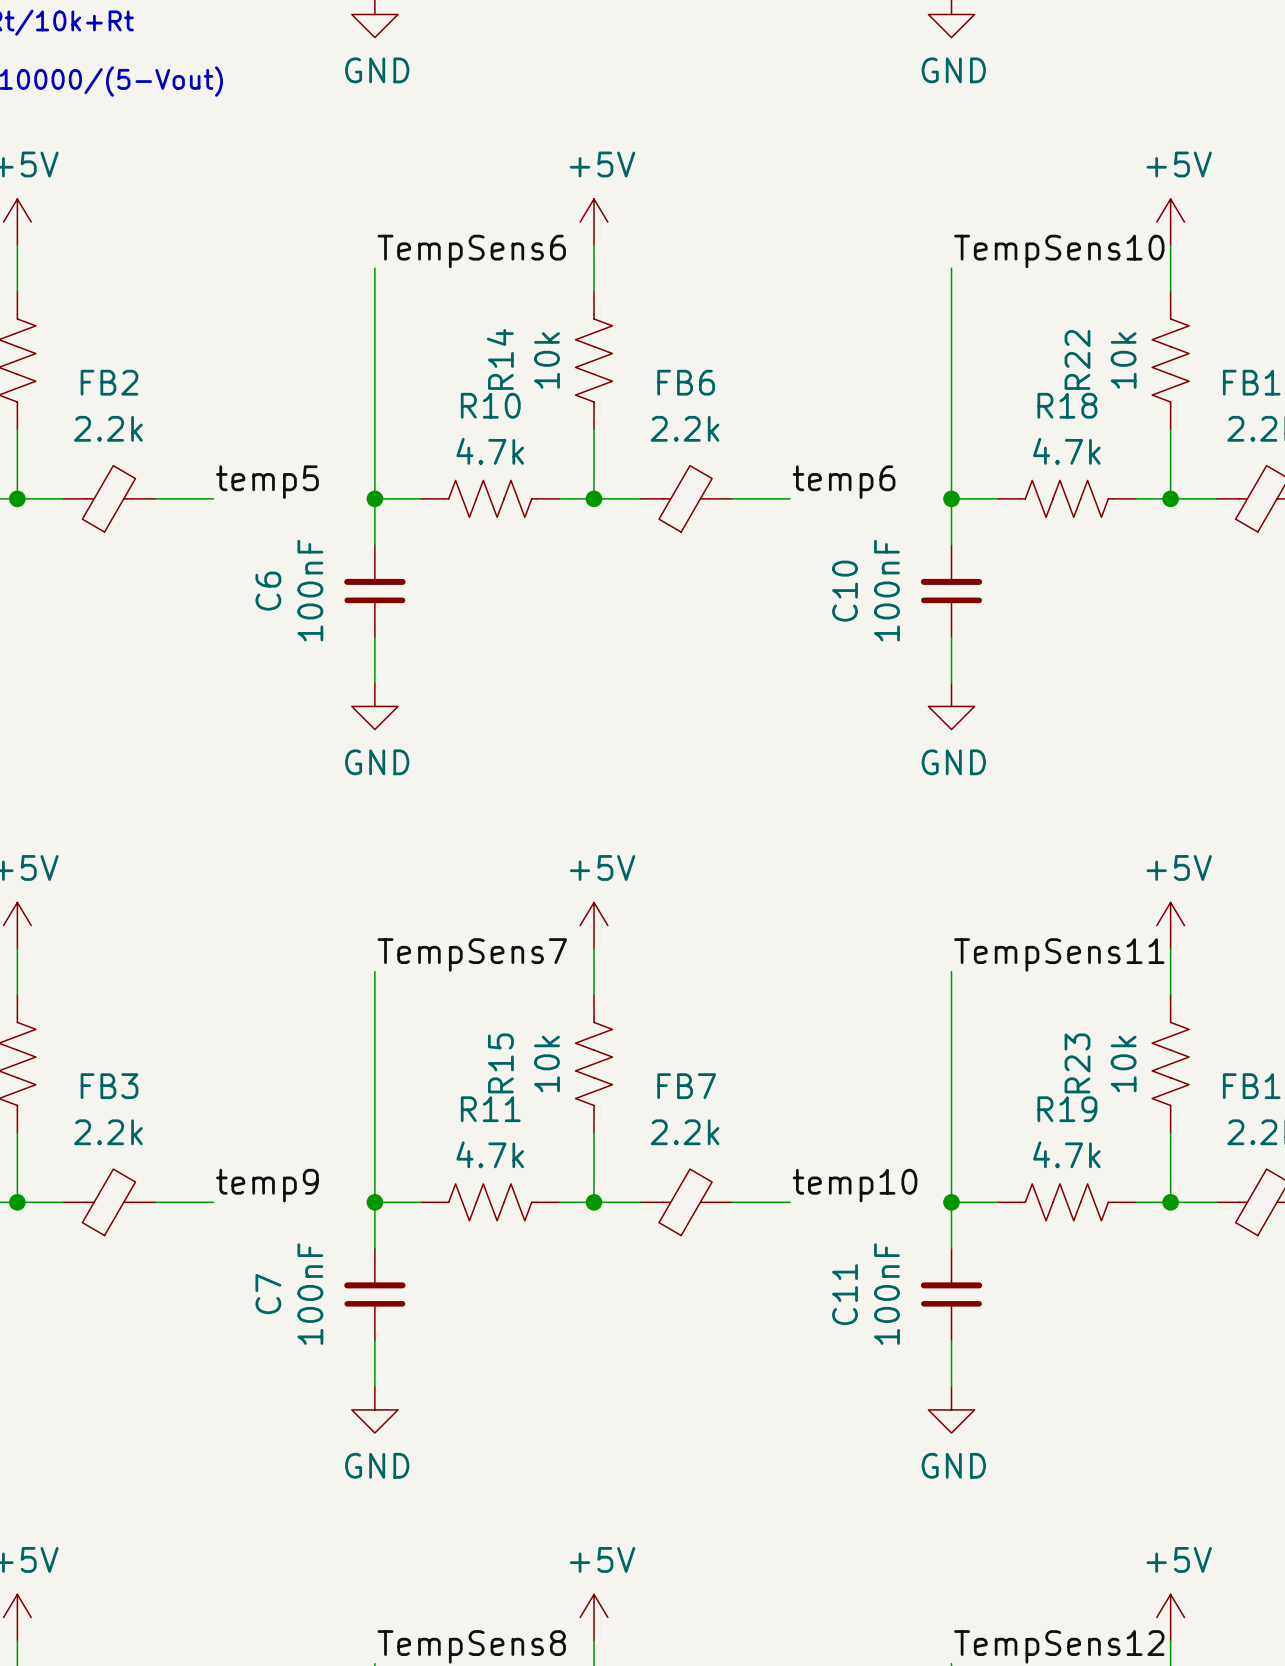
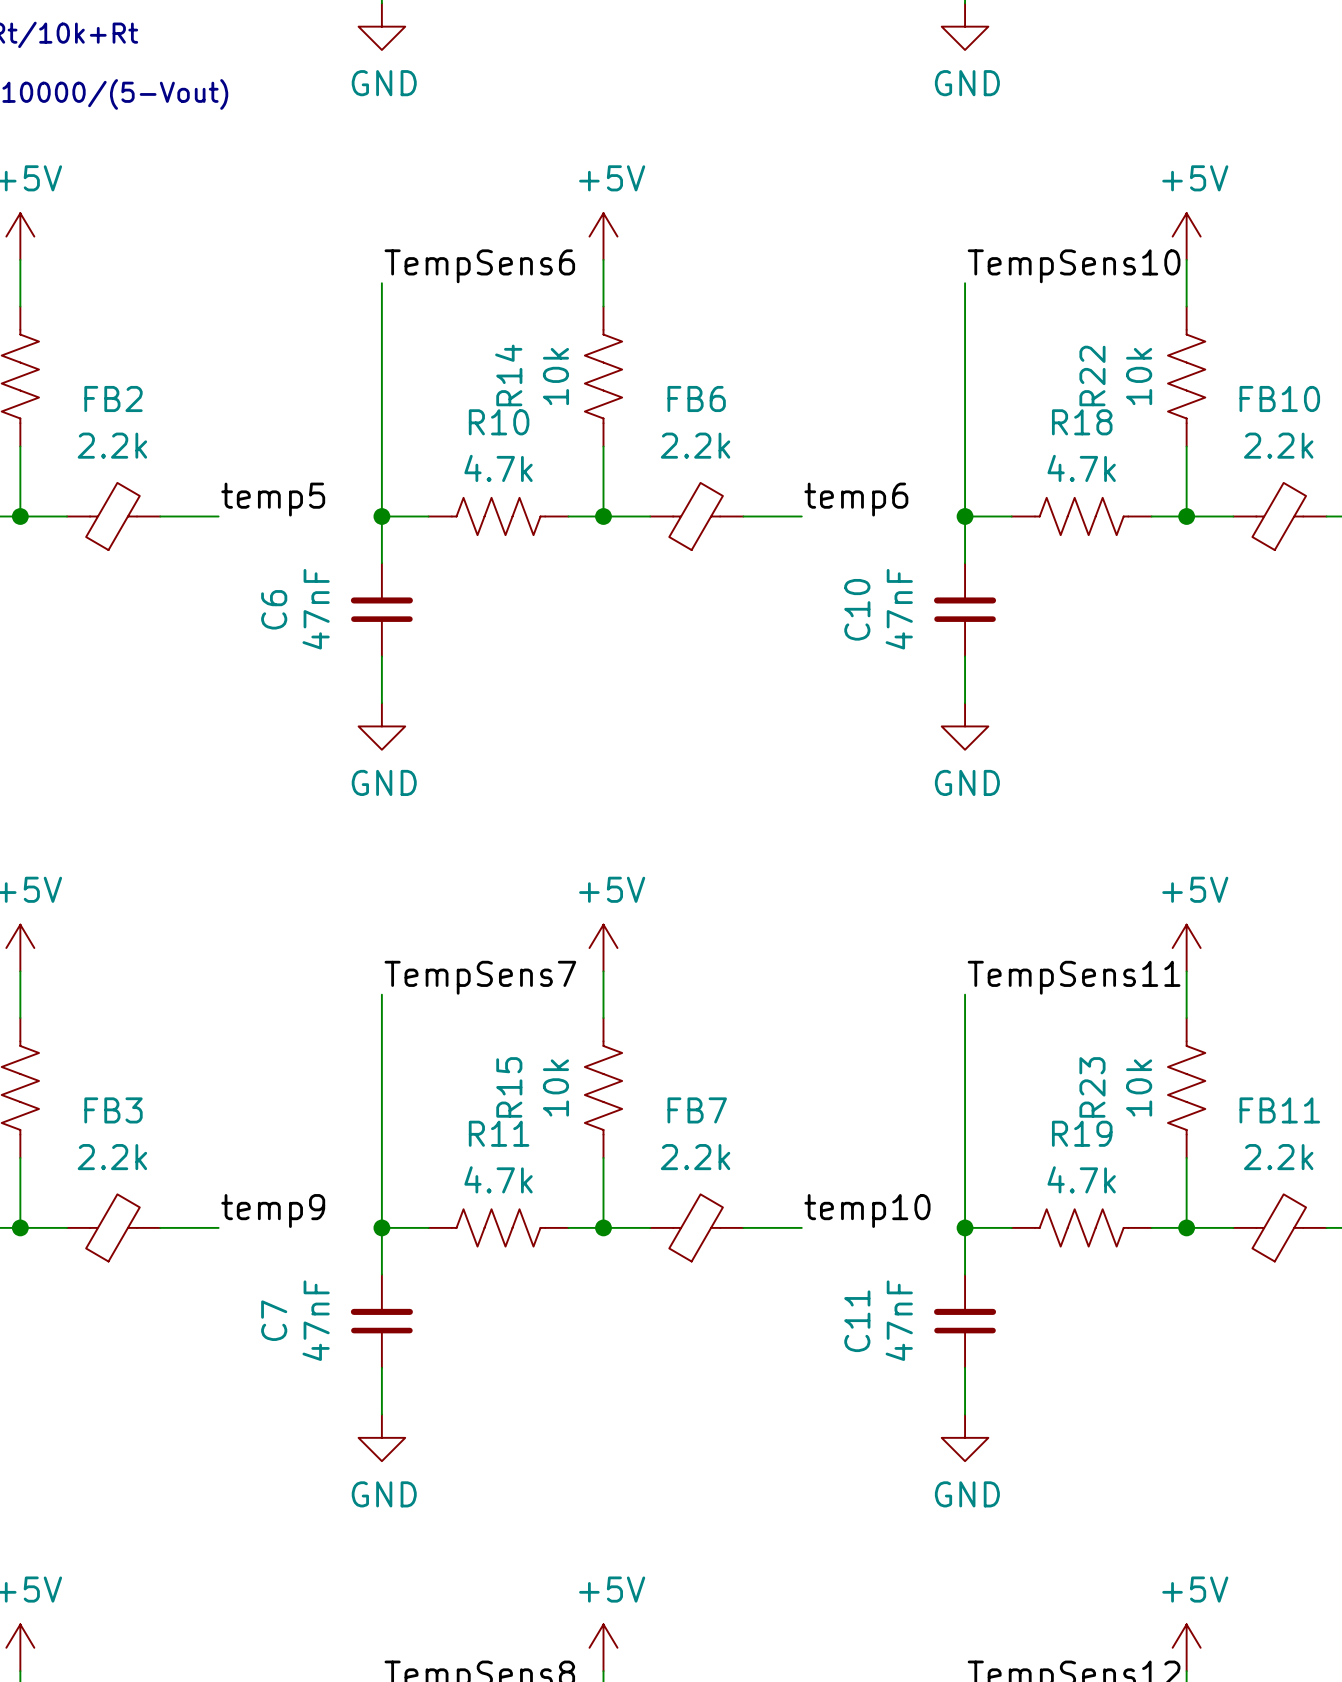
C6 value: 100nF (310, 590) -> 47nF (316, 609)
C10 value: 100nF (886, 590) -> 47nF (899, 609)
C7 value: 100nF (310, 1294) -> 47nF (316, 1320)
C11 value: 100nF (886, 1294) -> 47nF (899, 1320)

